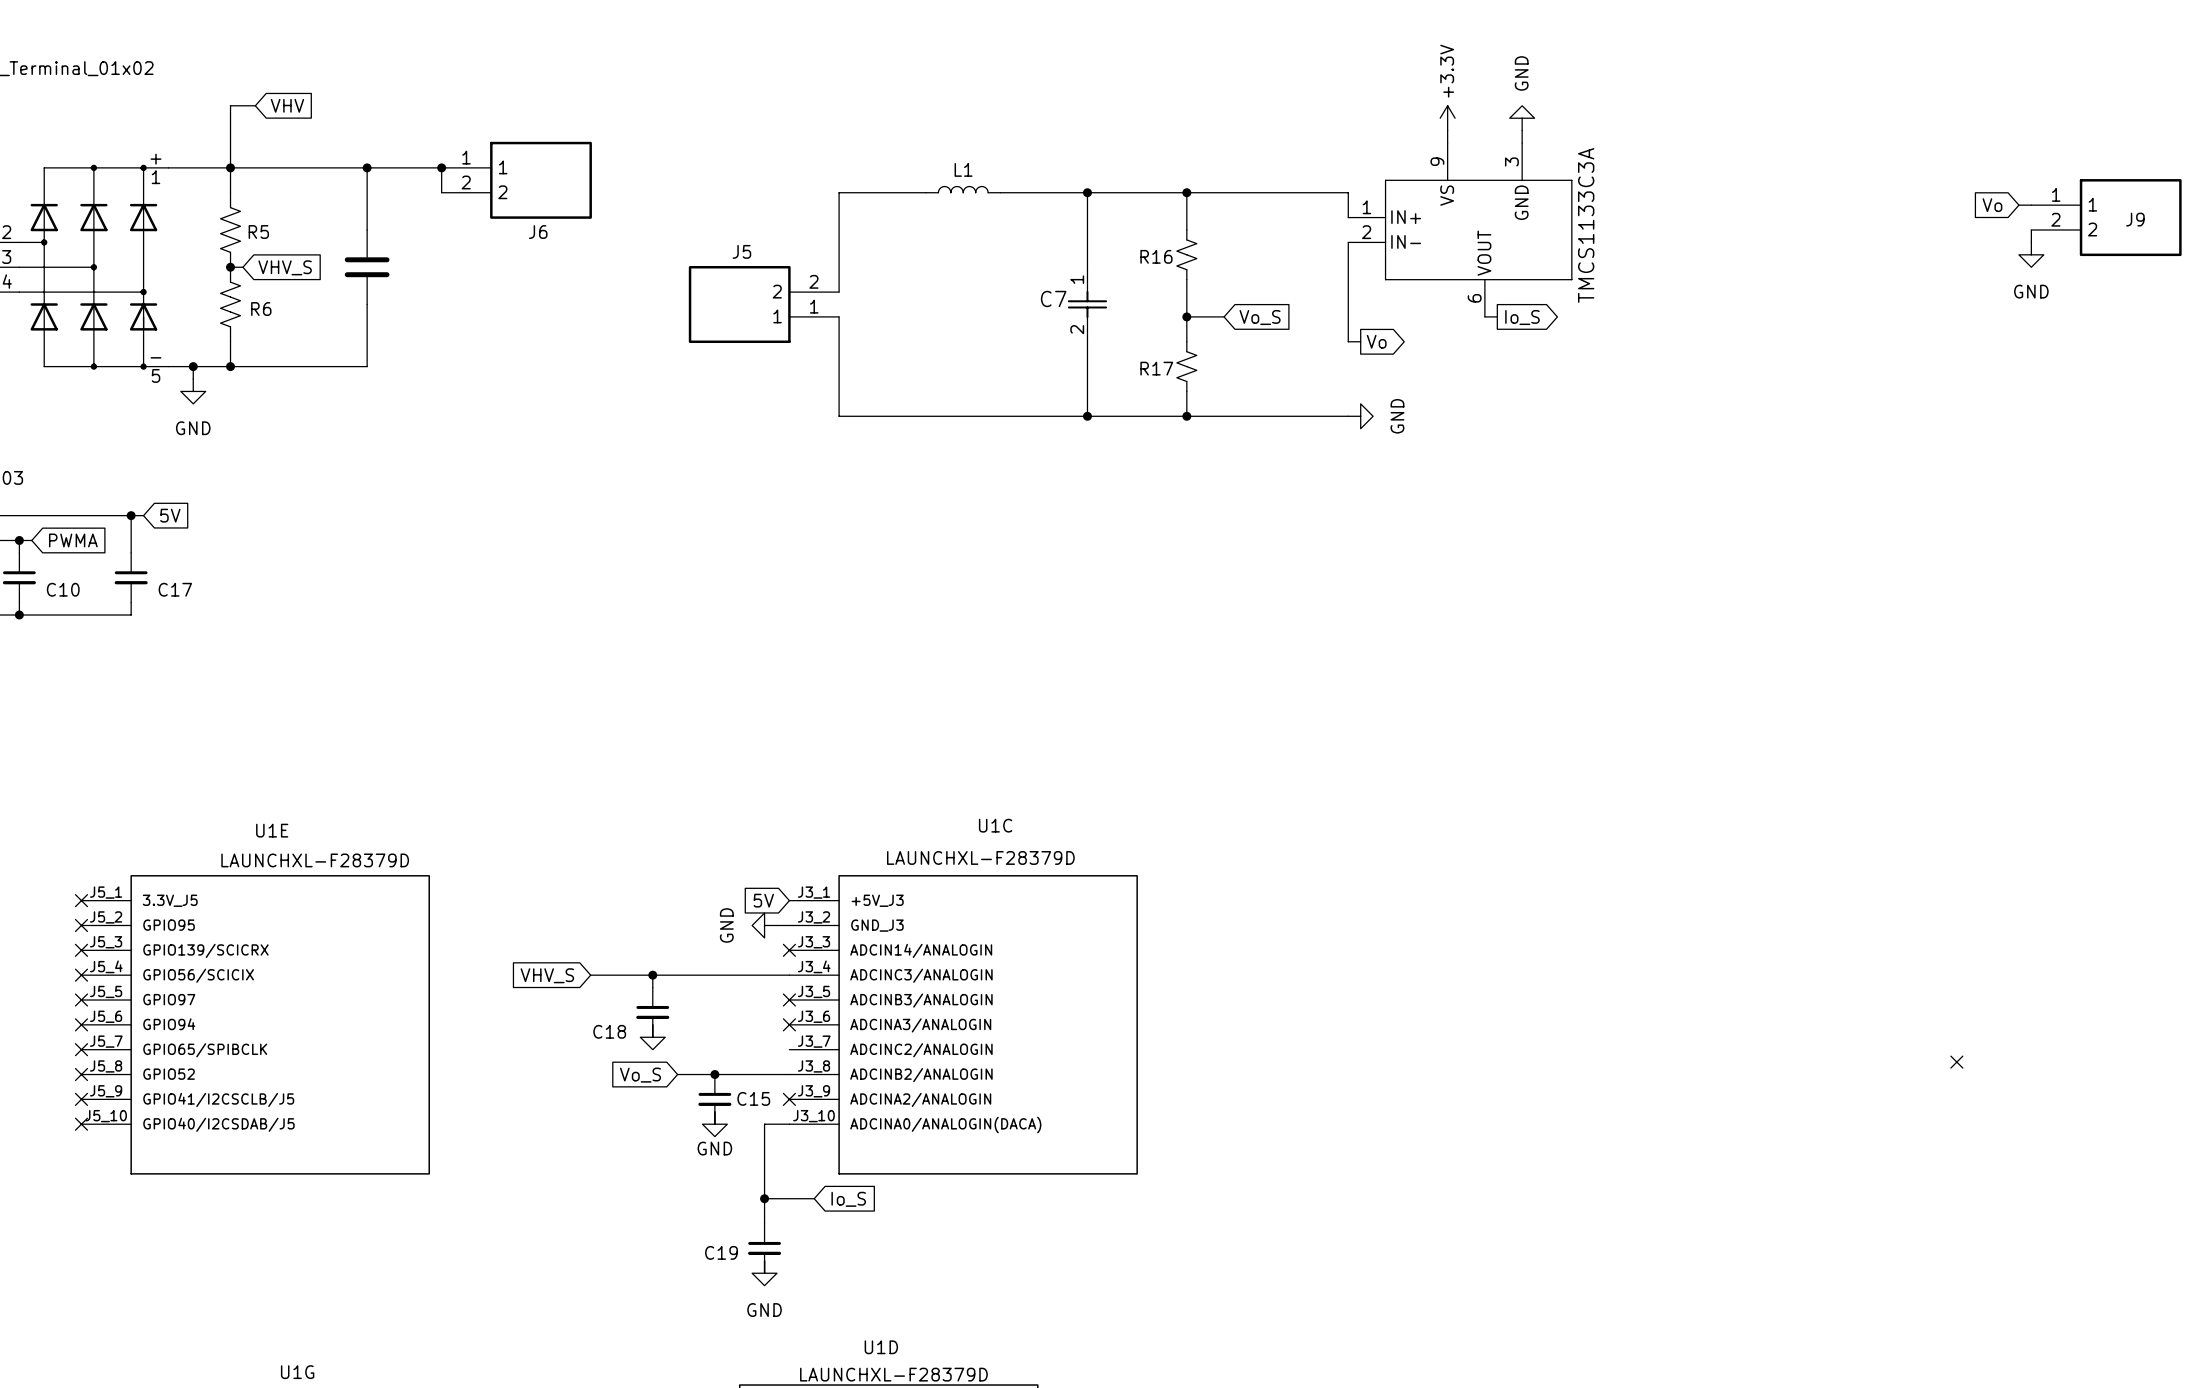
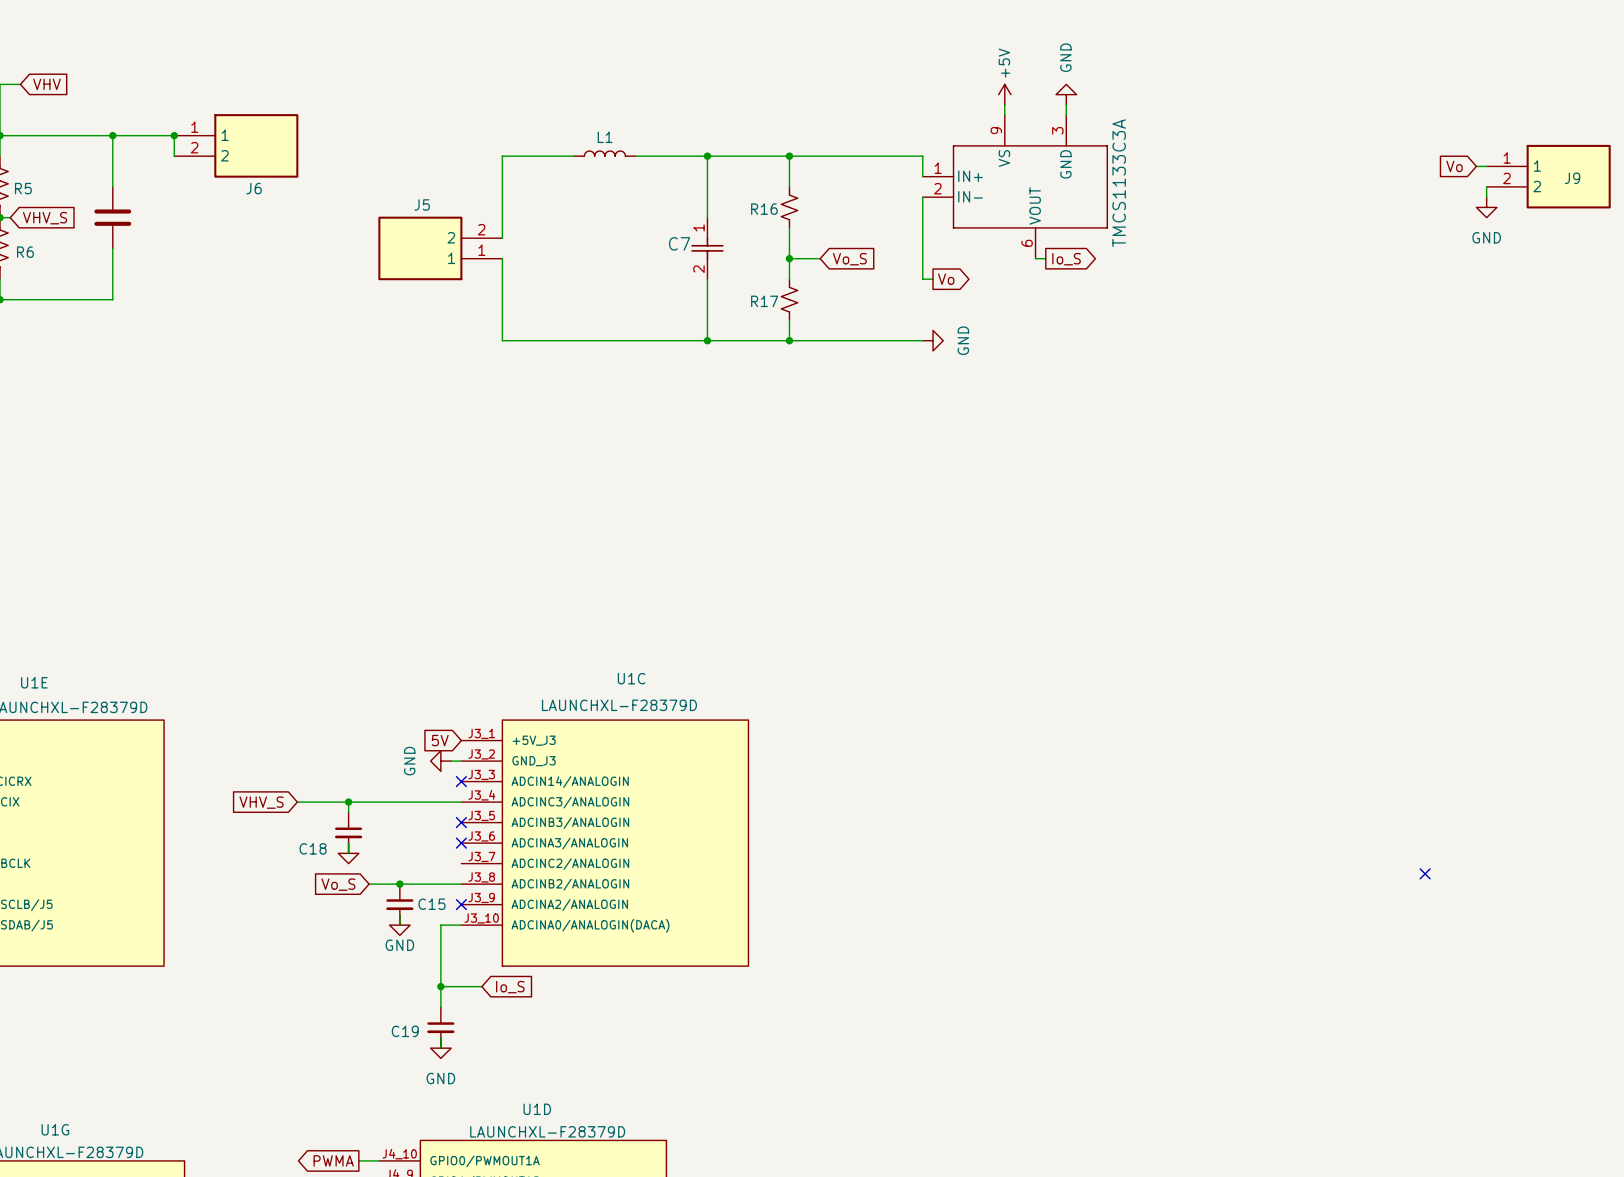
power symbol: +3.3V (1447, 118) -> +5V (1004, 94)

